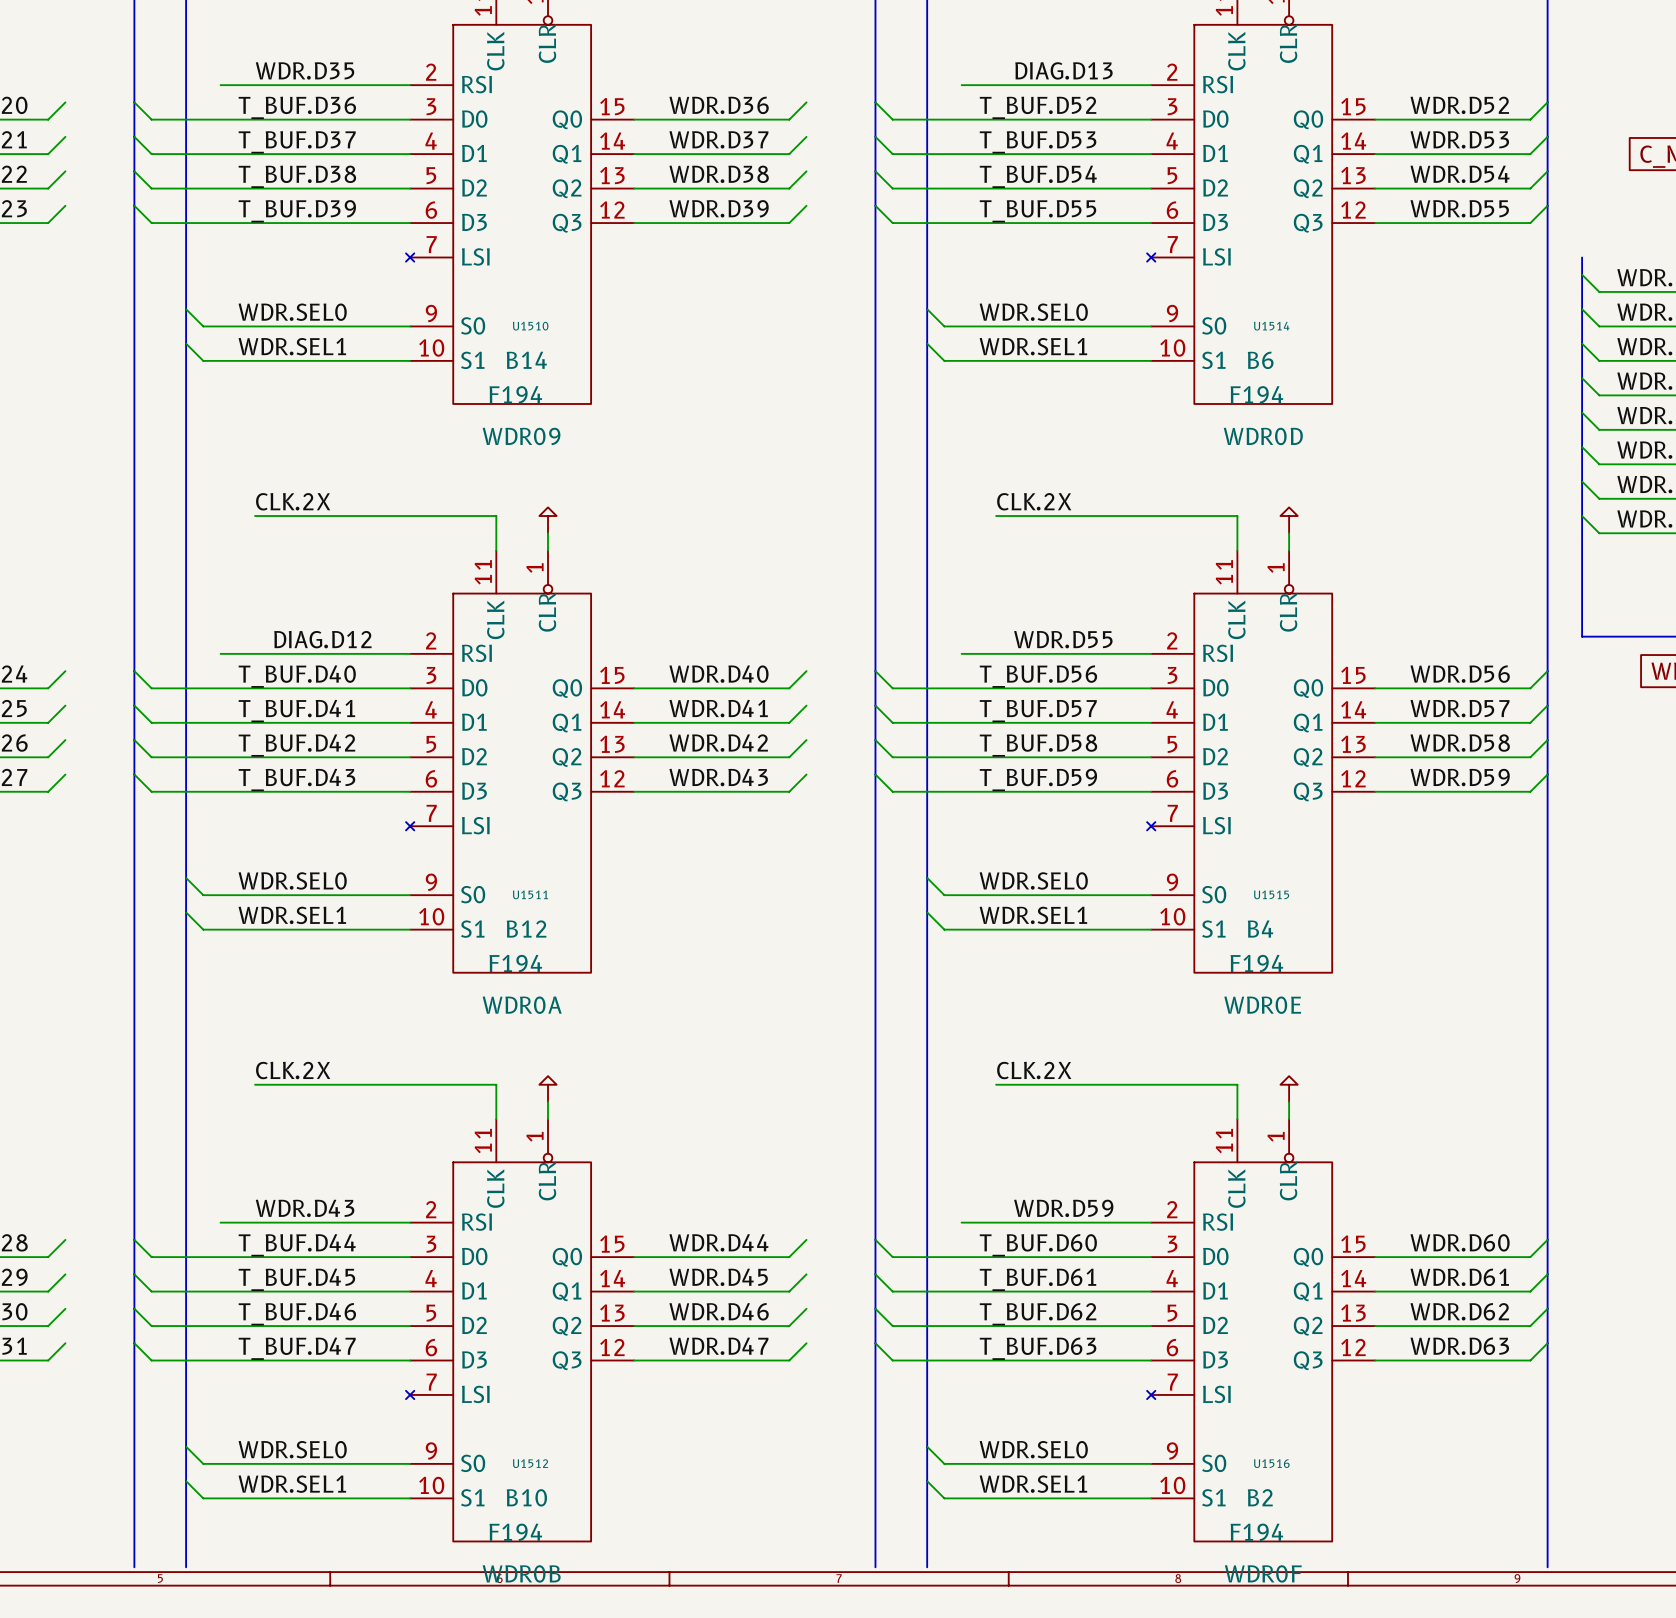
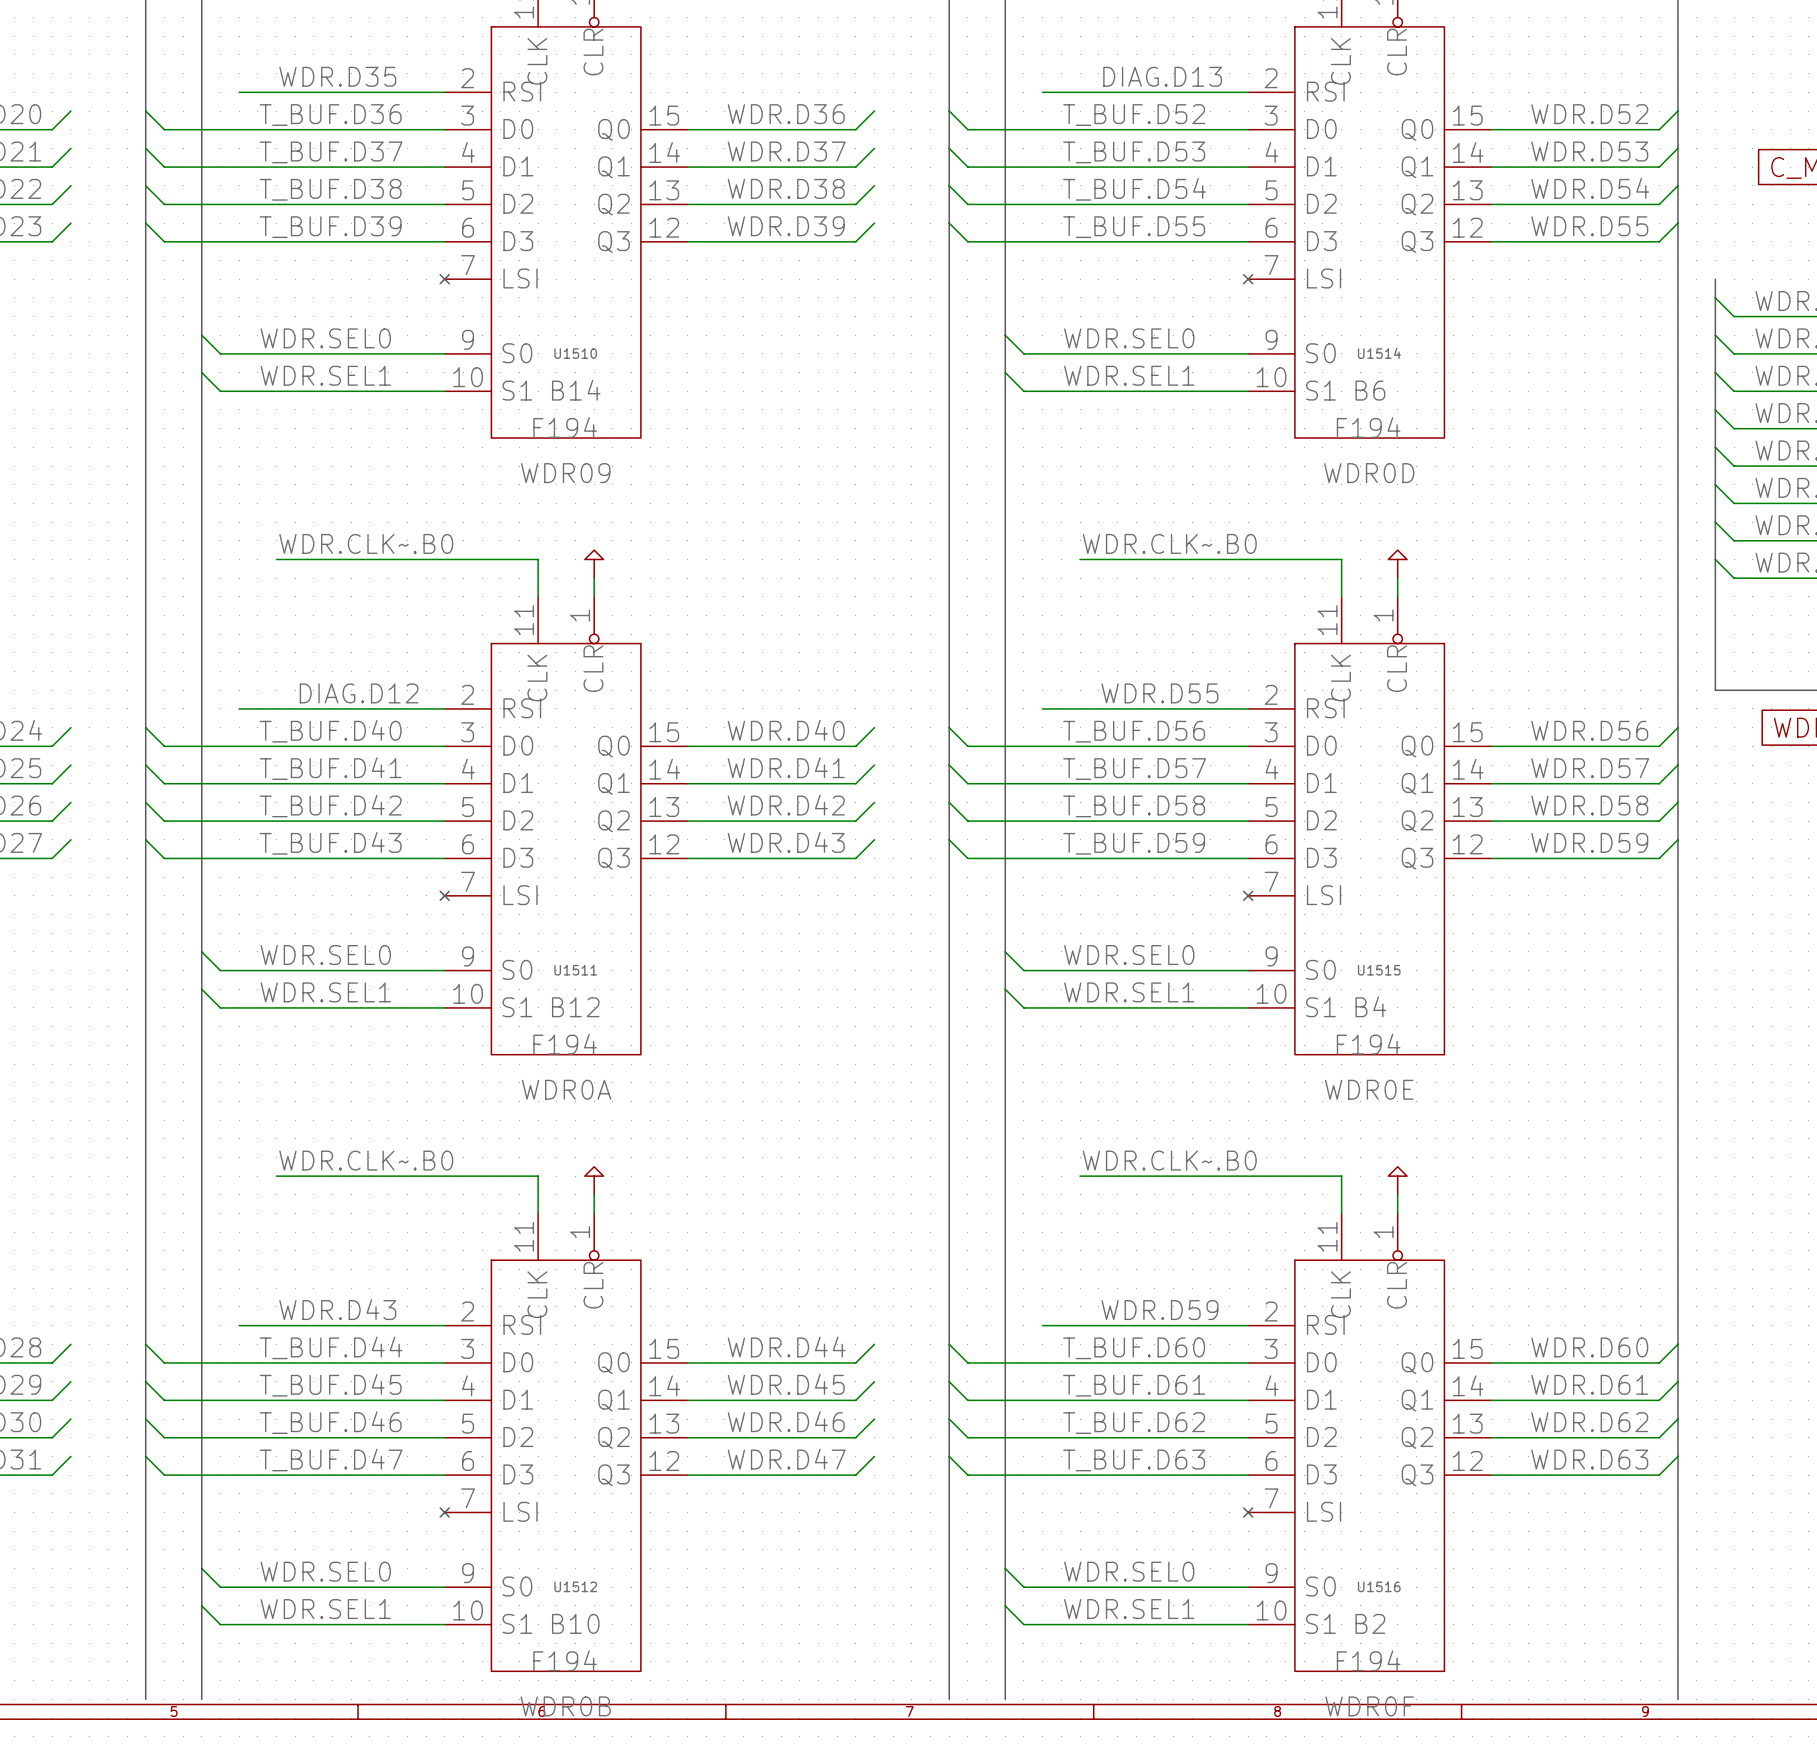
label: CLK.2X (293, 501) -> WDR.CLK~.B0 (366, 543)
label: CLK.2X (1034, 501) -> WDR.CLK~.B0 (1169, 543)
label: CLK.2X (293, 1070) -> WDR.CLK~.B0 (366, 1160)
label: CLK.2X (1034, 1070) -> WDR.CLK~.B0 (1169, 1160)

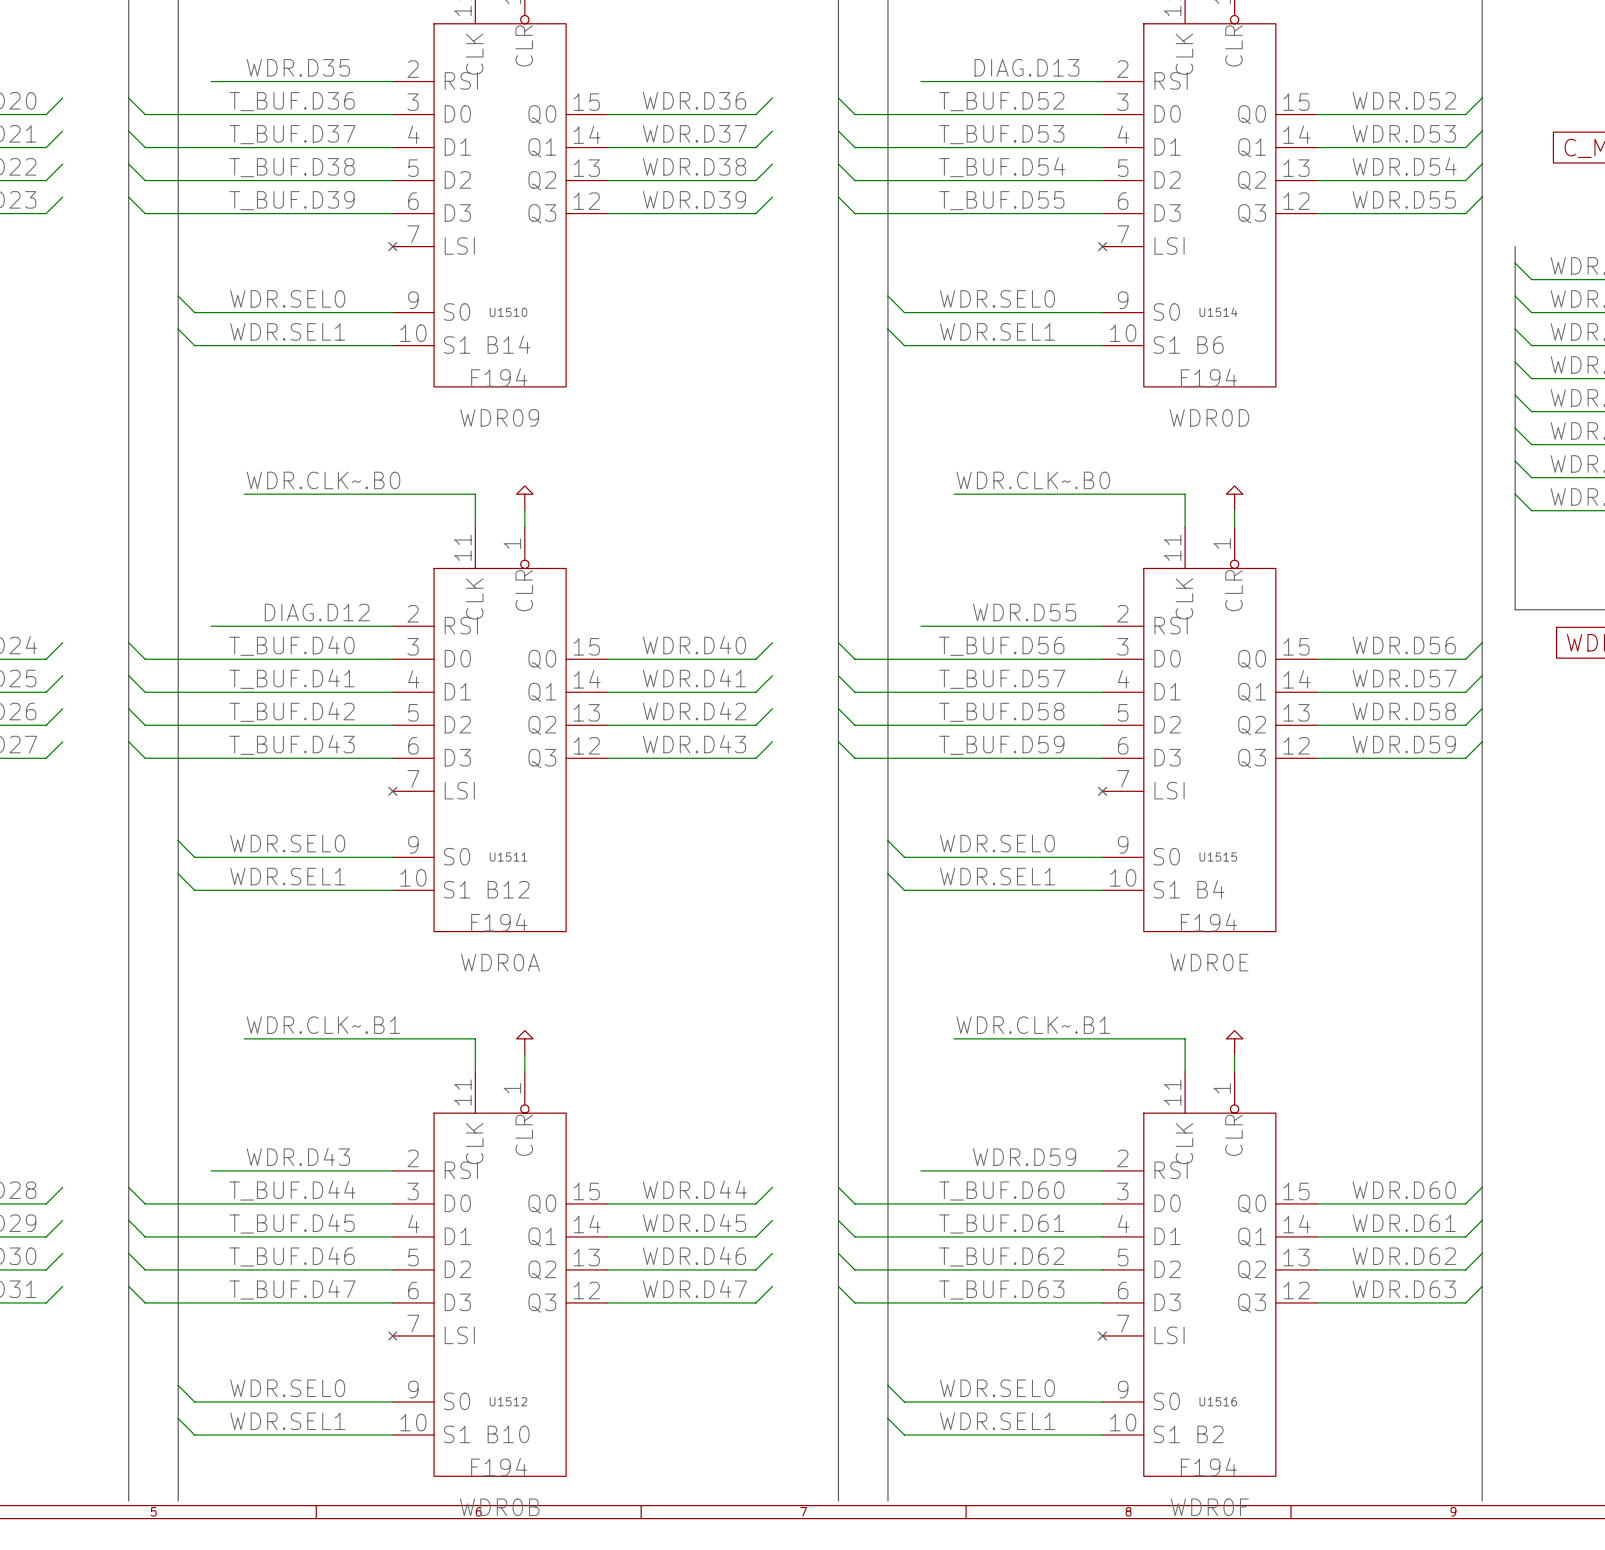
label: WDR.CLK~.B0 (366, 1160) -> WDR.CLK~.B1 (323, 1025)
label: WDR.CLK~.B0 (1169, 1160) -> WDR.CLK~.B1 (1033, 1025)

